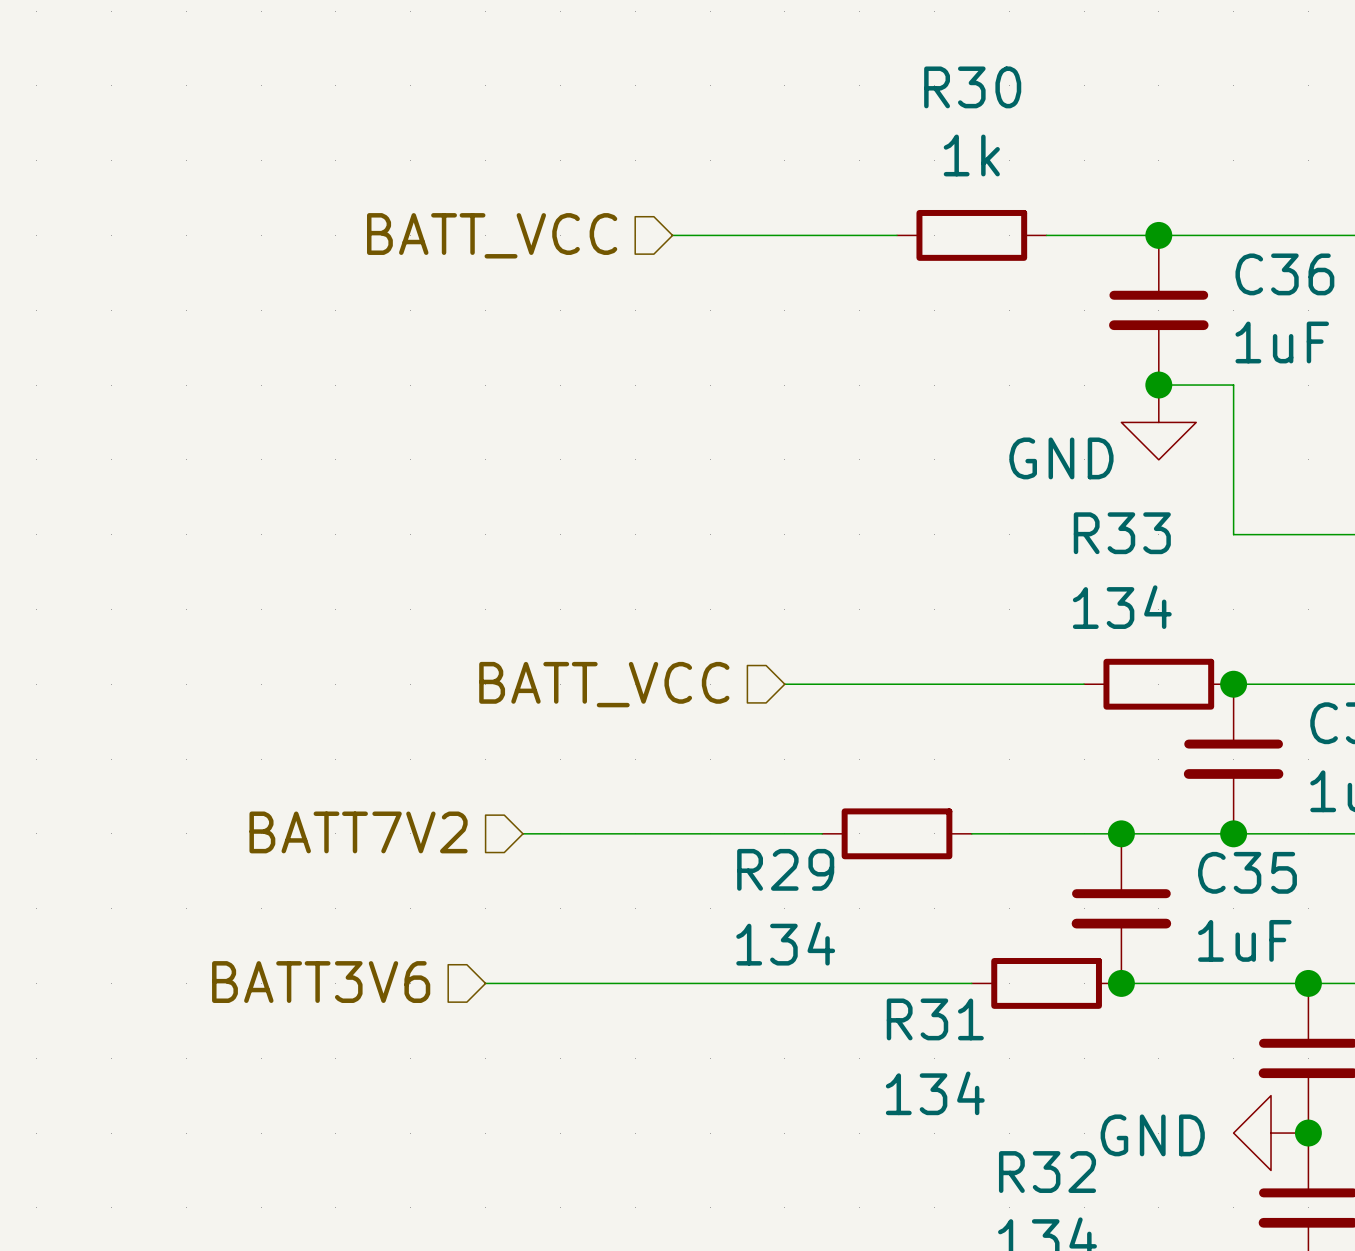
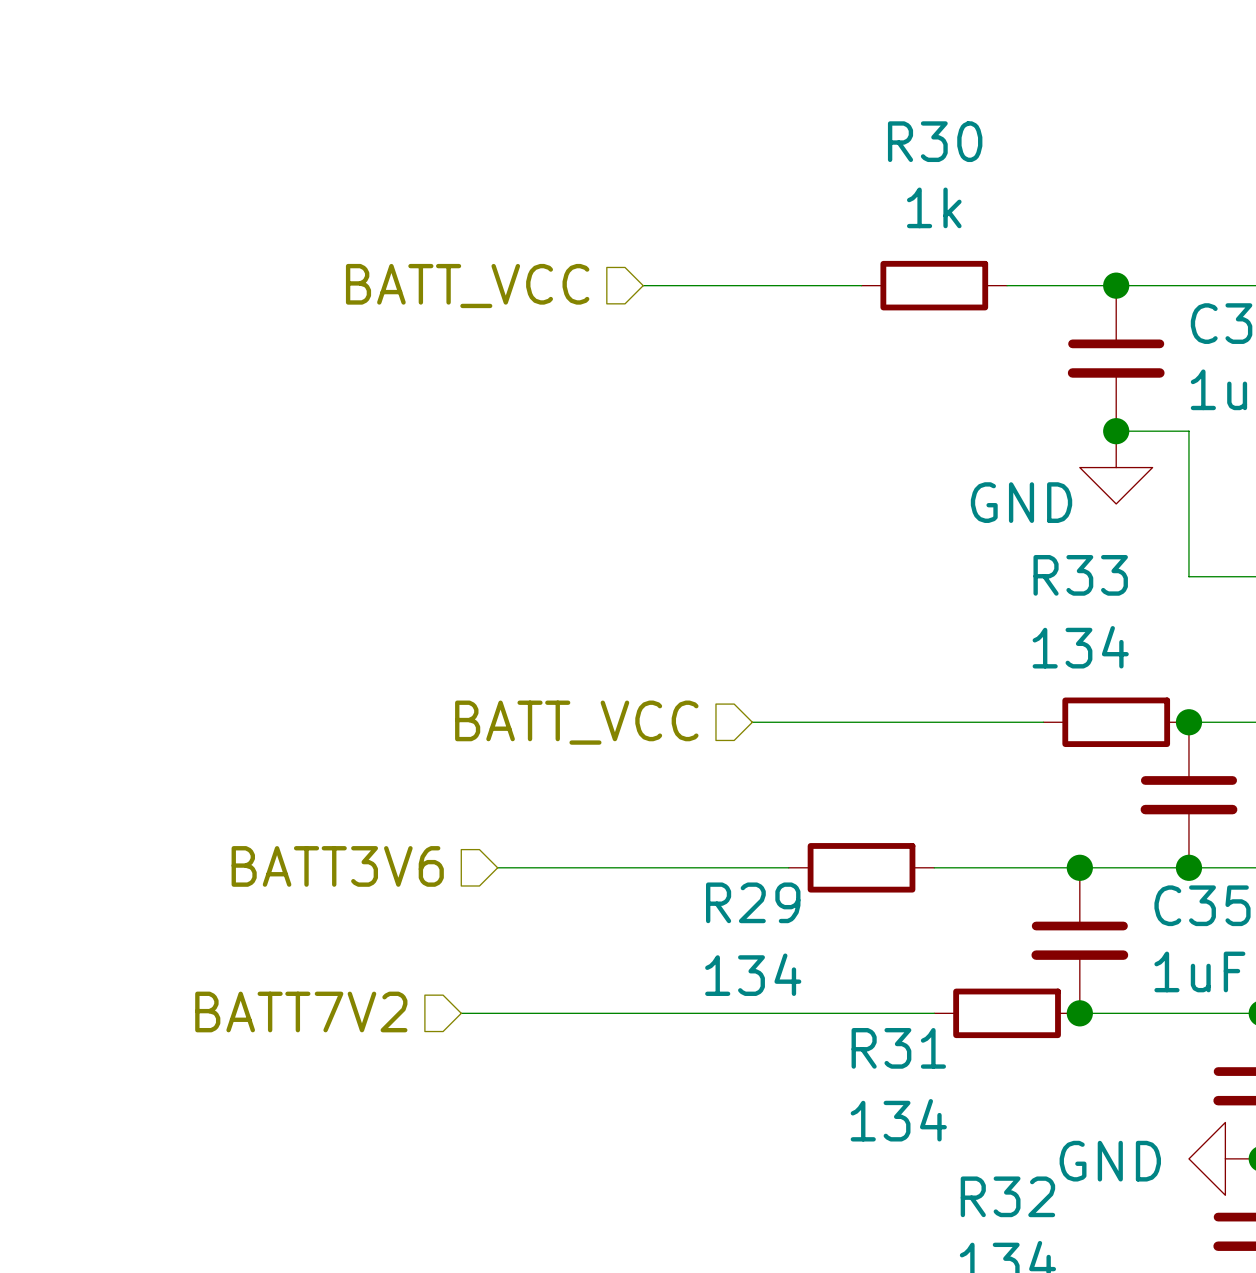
hierarchical label: BATT7V2 (358, 832) -> BATT3V6 (337, 866)
hierarchical label: BATT3V6 (321, 982) -> BATT7V2 (301, 1011)

